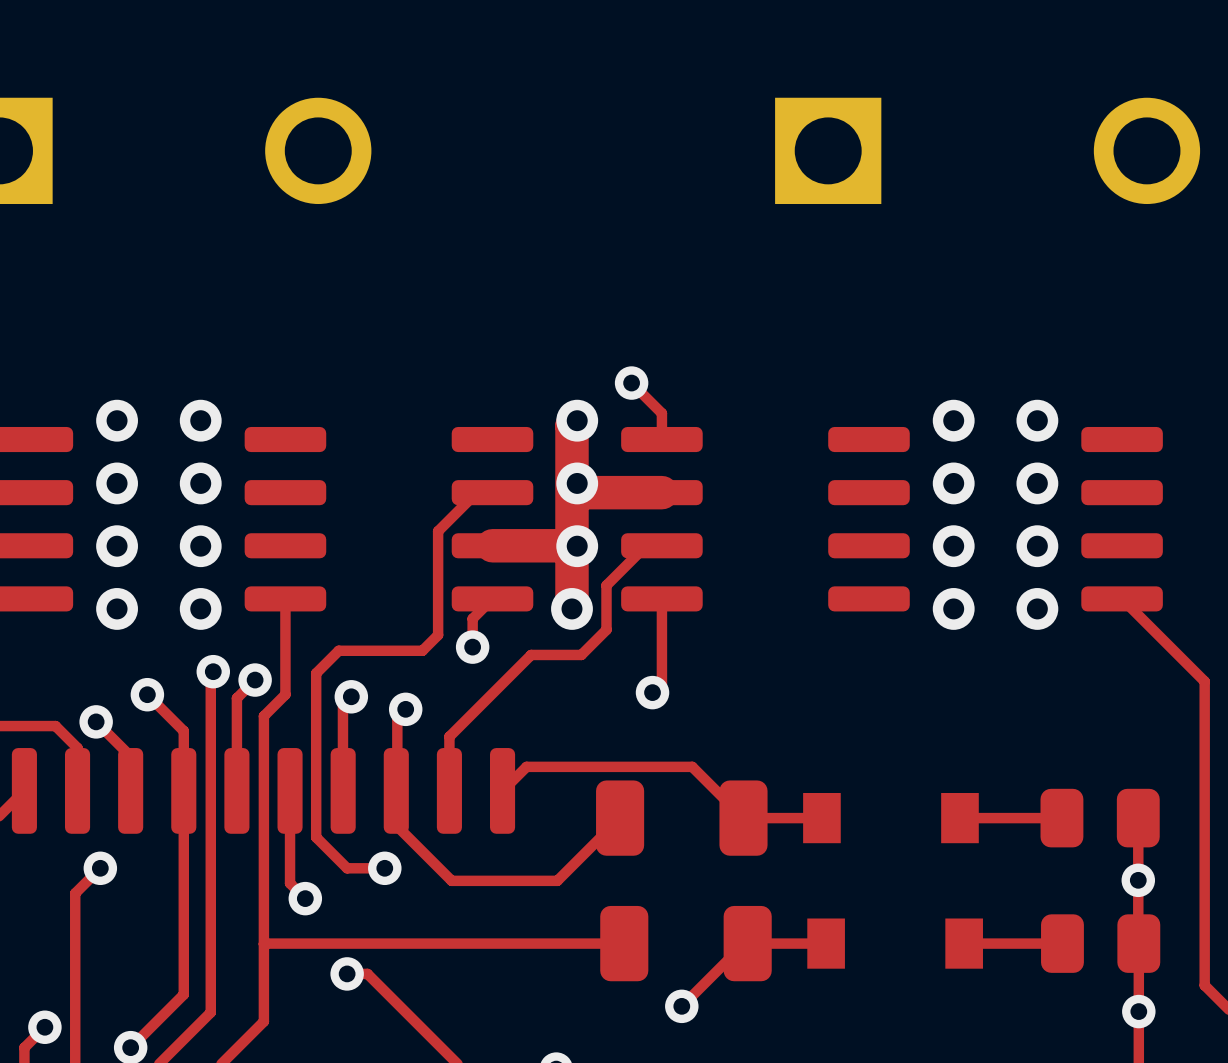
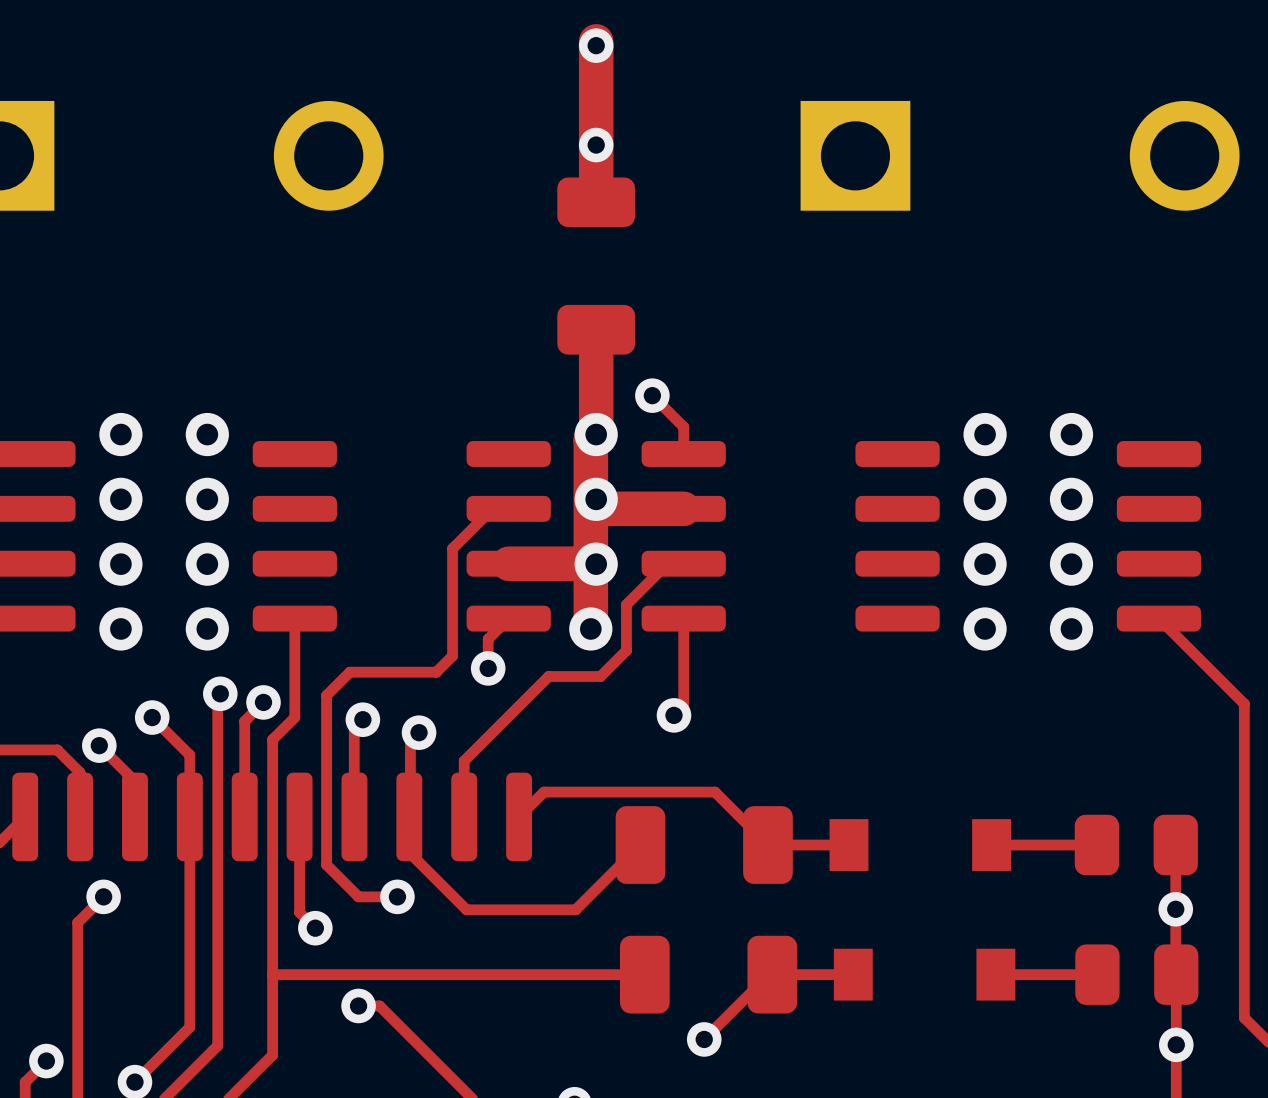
top track: none -> (596, 41) (596, 202)
via: none -> (596, 45)
via: none -> (596, 145)
part: none -> (596, 266)
top track: none -> (596, 329) (596, 434)

